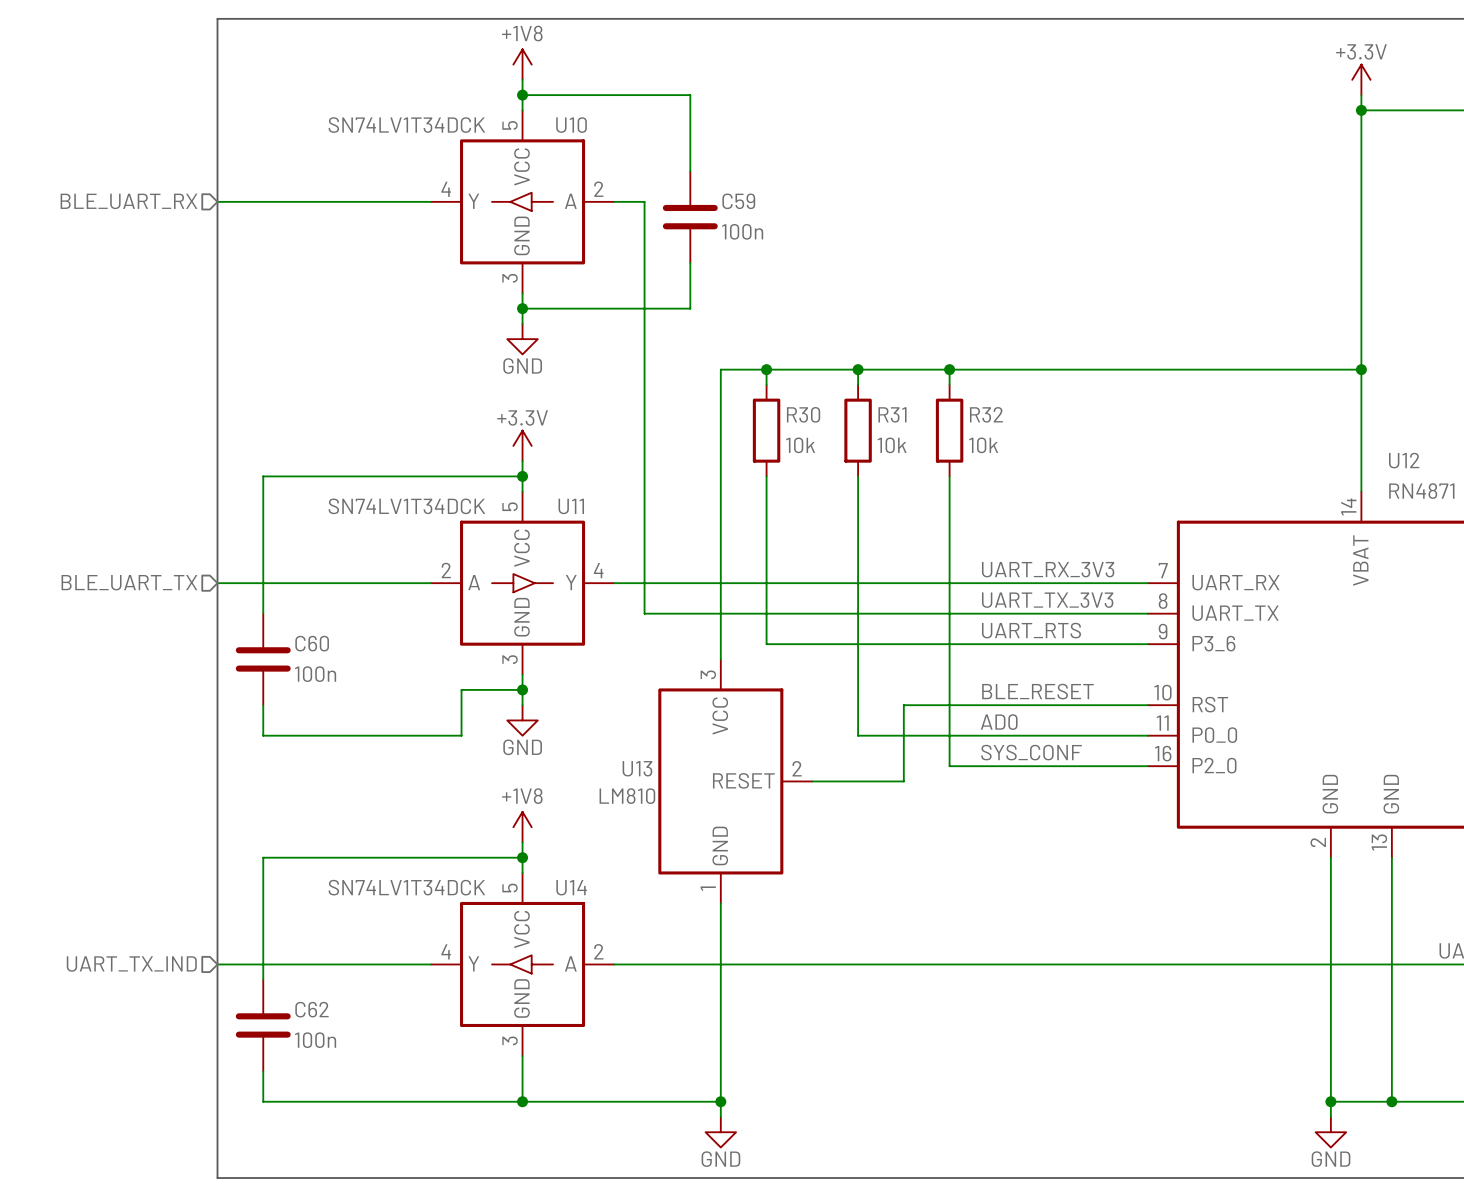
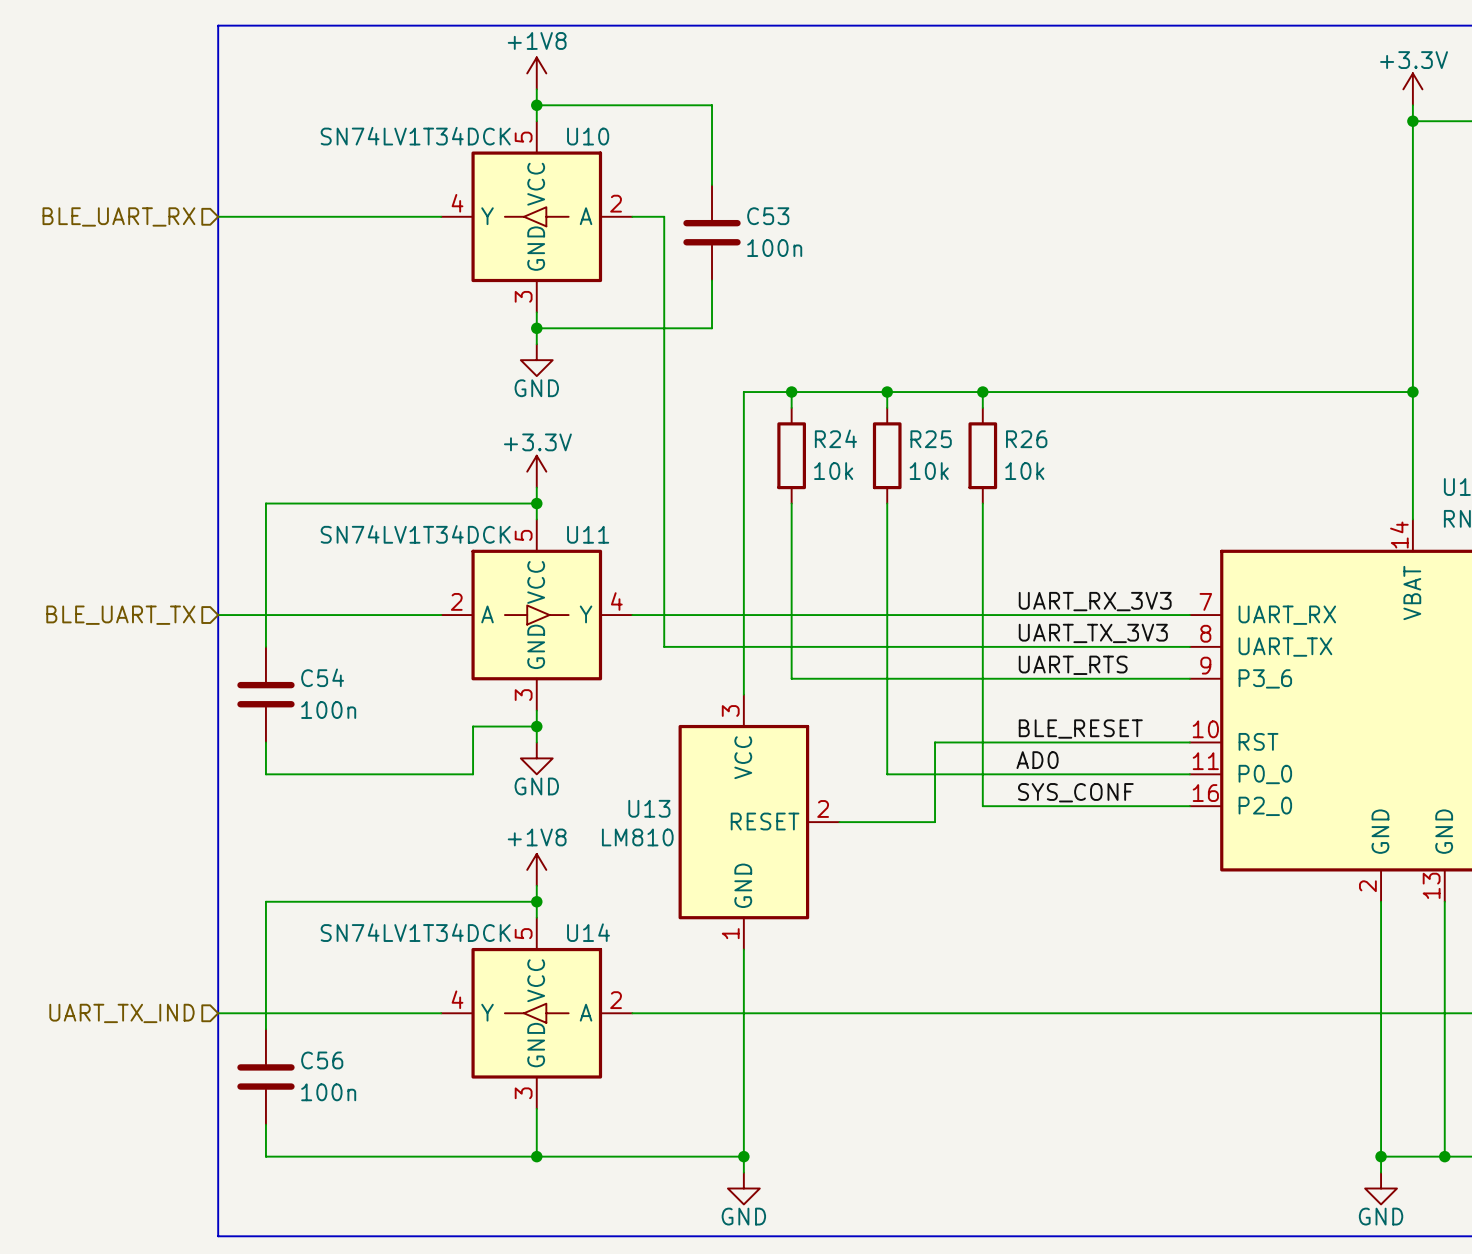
C59 name: C59 (738, 201) -> C53 (768, 216)
R30 name: R30 (803, 414) -> R24 (835, 438)
R31 name: R31 (892, 414) -> R25 (931, 439)
R32 name: R32 (986, 414) -> R26 (1026, 439)
C60 name: C60 (312, 643) -> C54 (322, 677)
C62 name: C62 (311, 1009) -> C56 (322, 1060)

